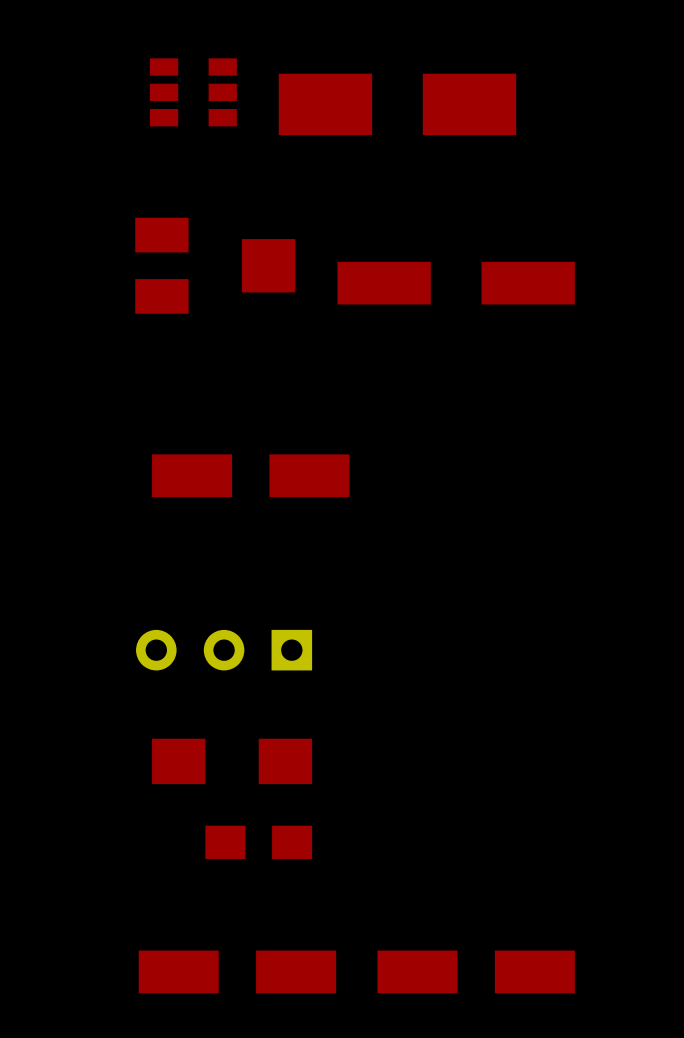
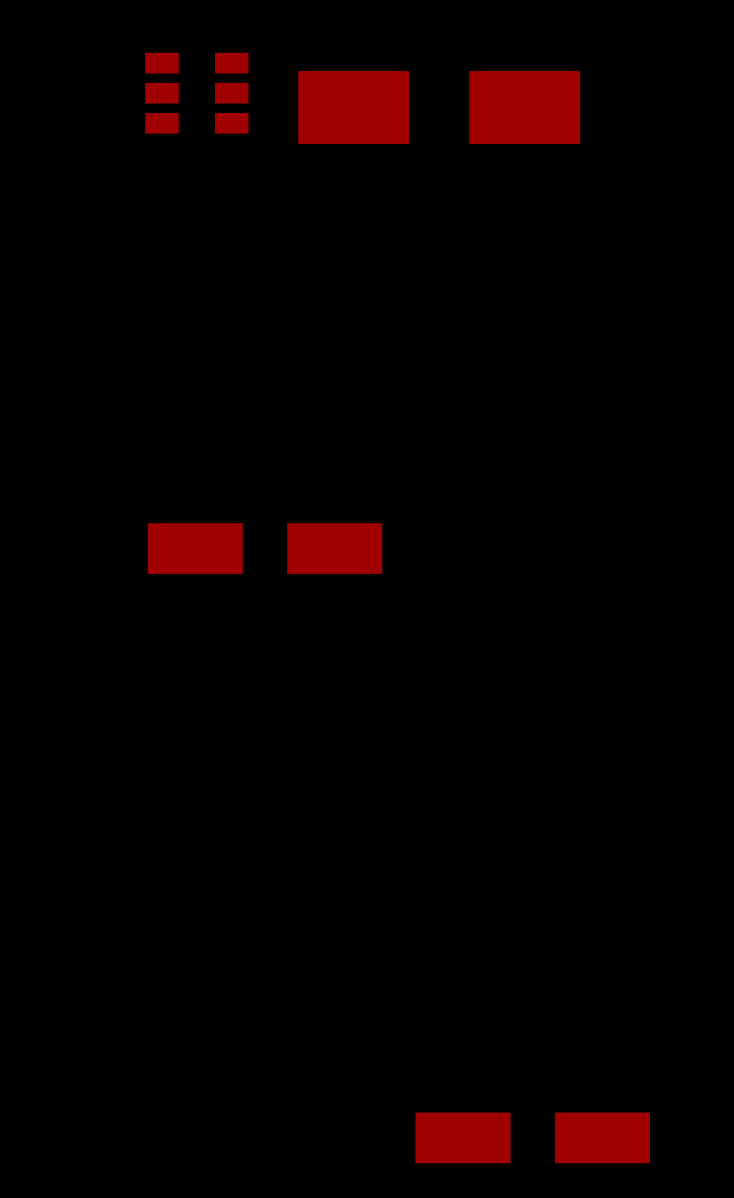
part: (215, 265) -> none
part: (456, 283) -> none
part: (224, 650) -> none
part: (232, 761) -> none
part: (258, 842) -> none
part: (237, 971) -> none

